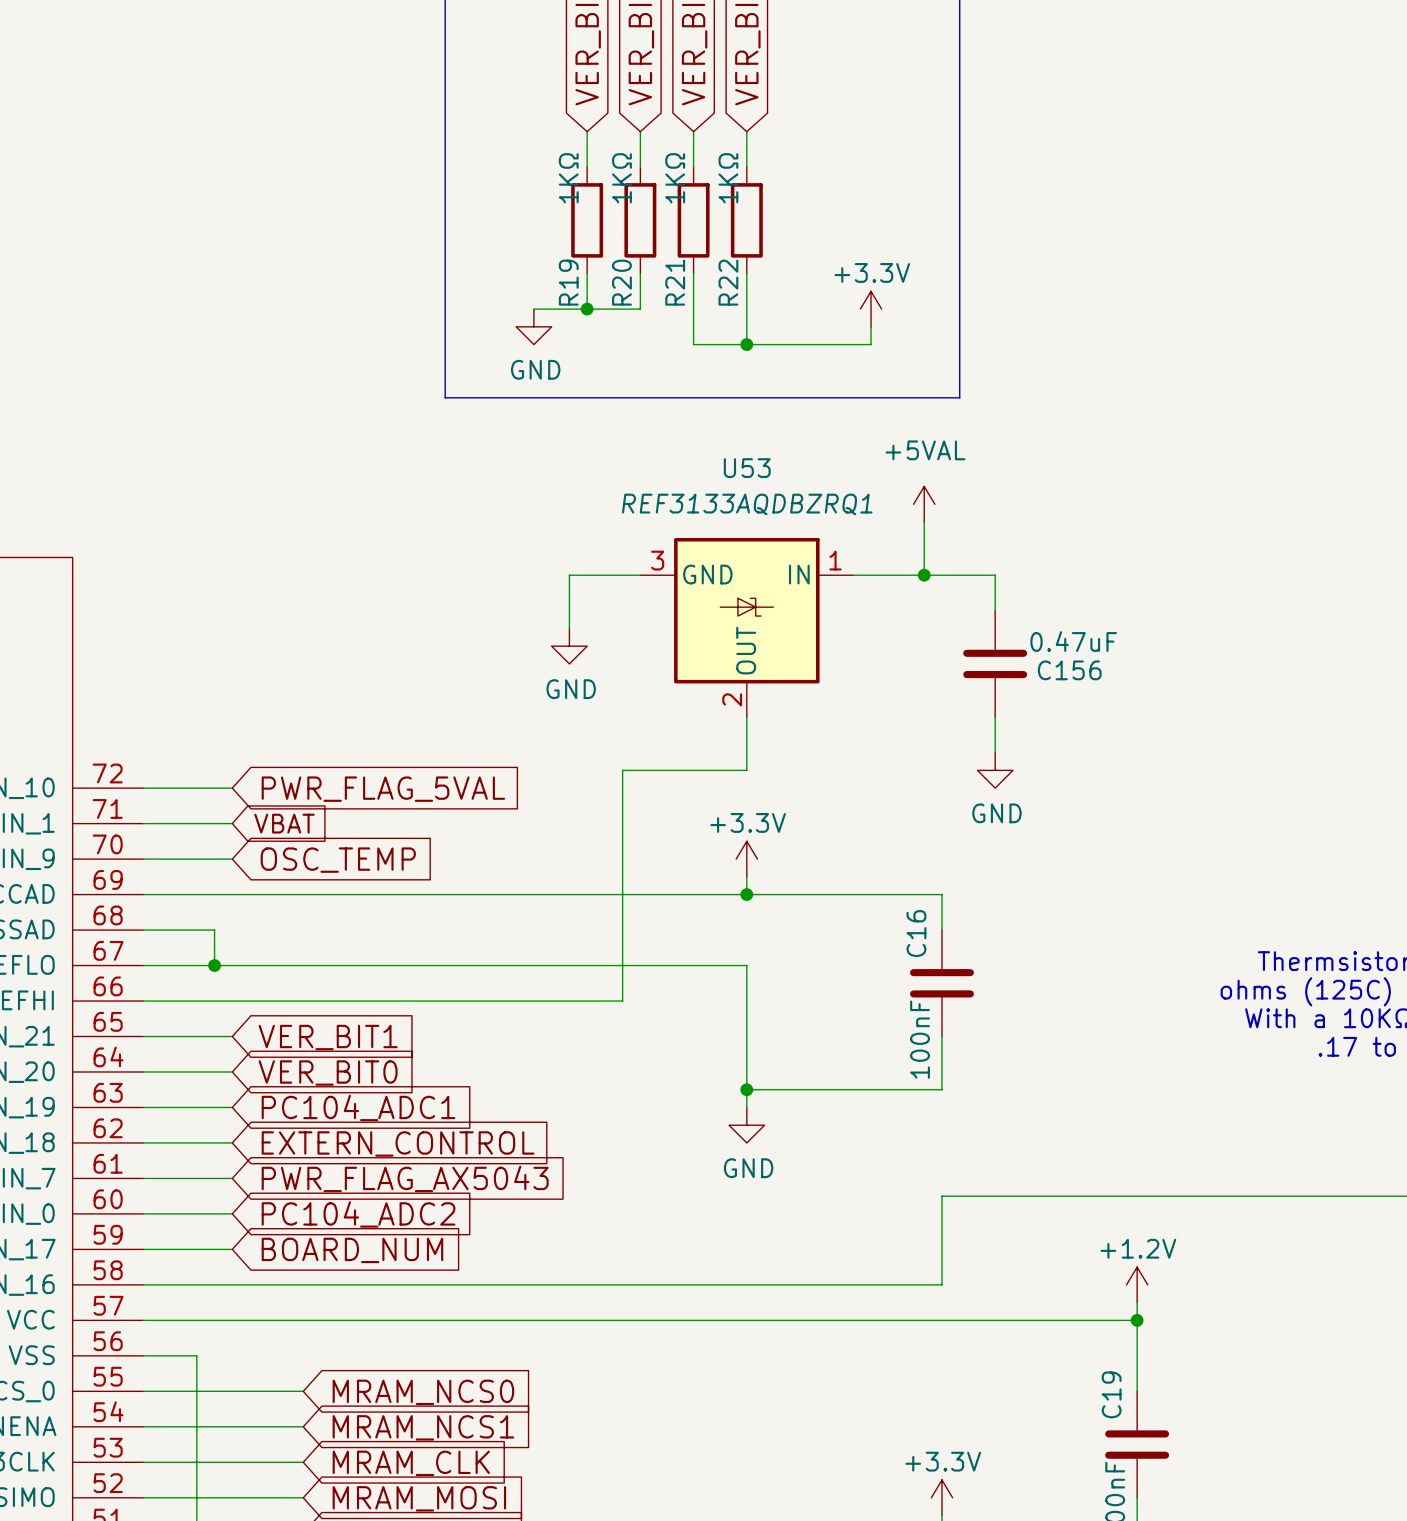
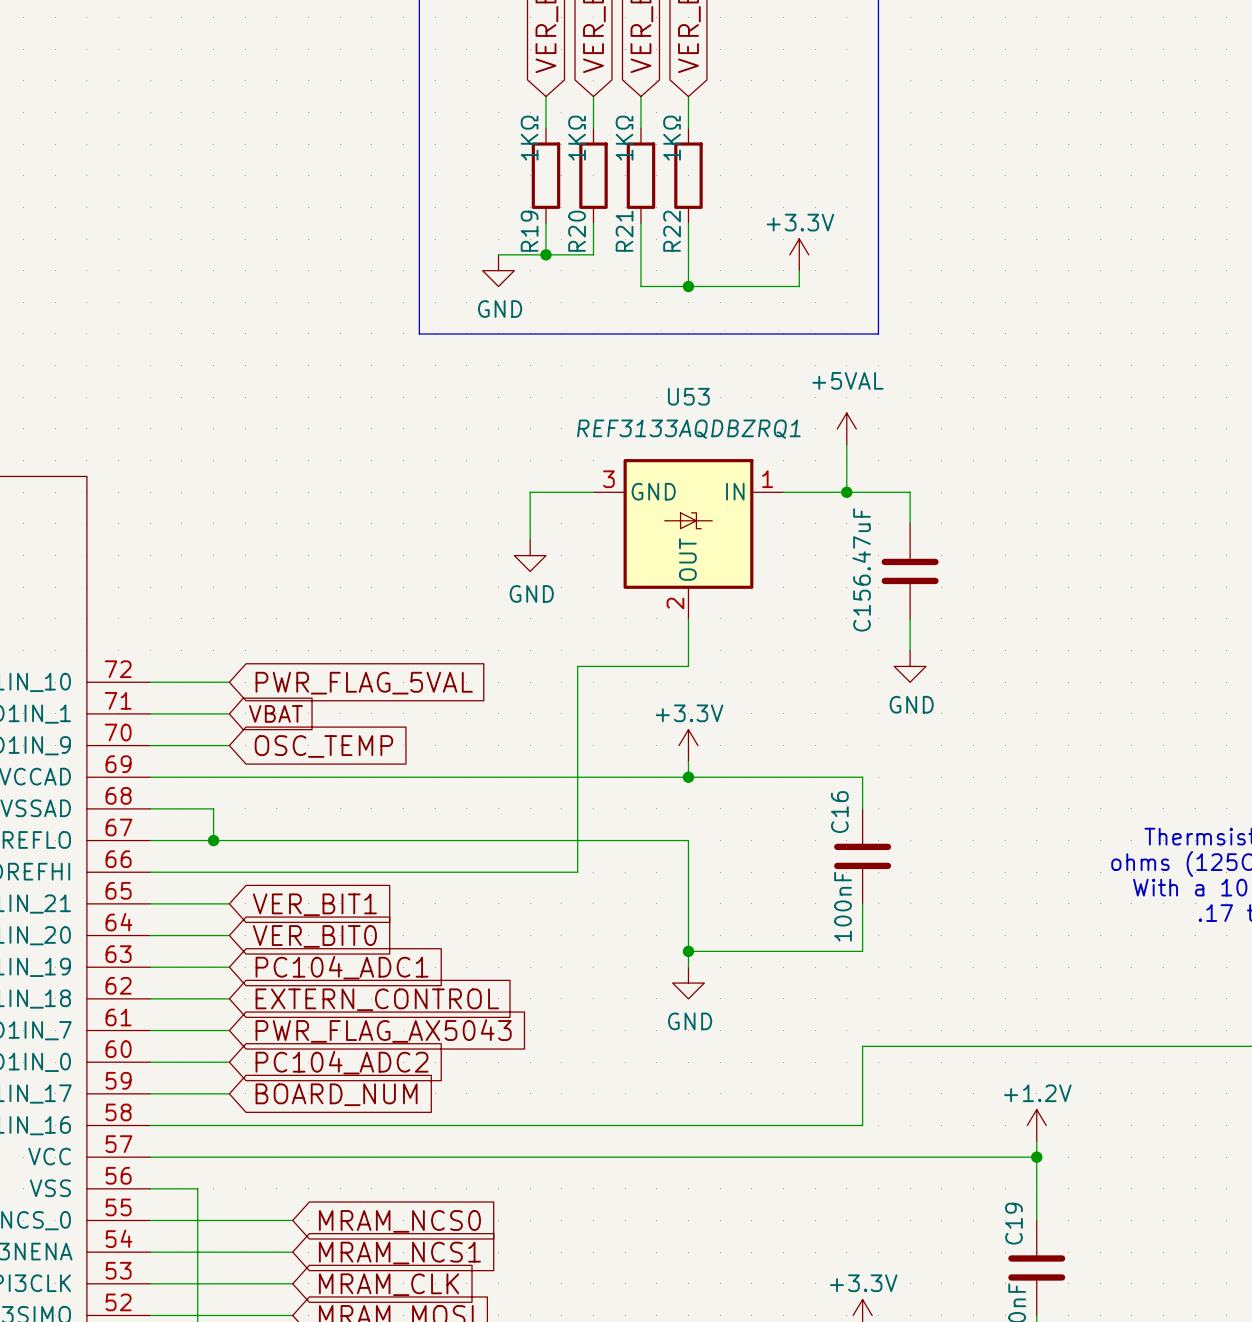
C156 value: 0.47uF (1073, 641) -> .47uF (861, 539)
C156 name rotation: 0° (1069, 670) -> 90° counterclockwise (862, 603)
C156 name position: C156 (1069, 670) -> C156 (862, 603)

